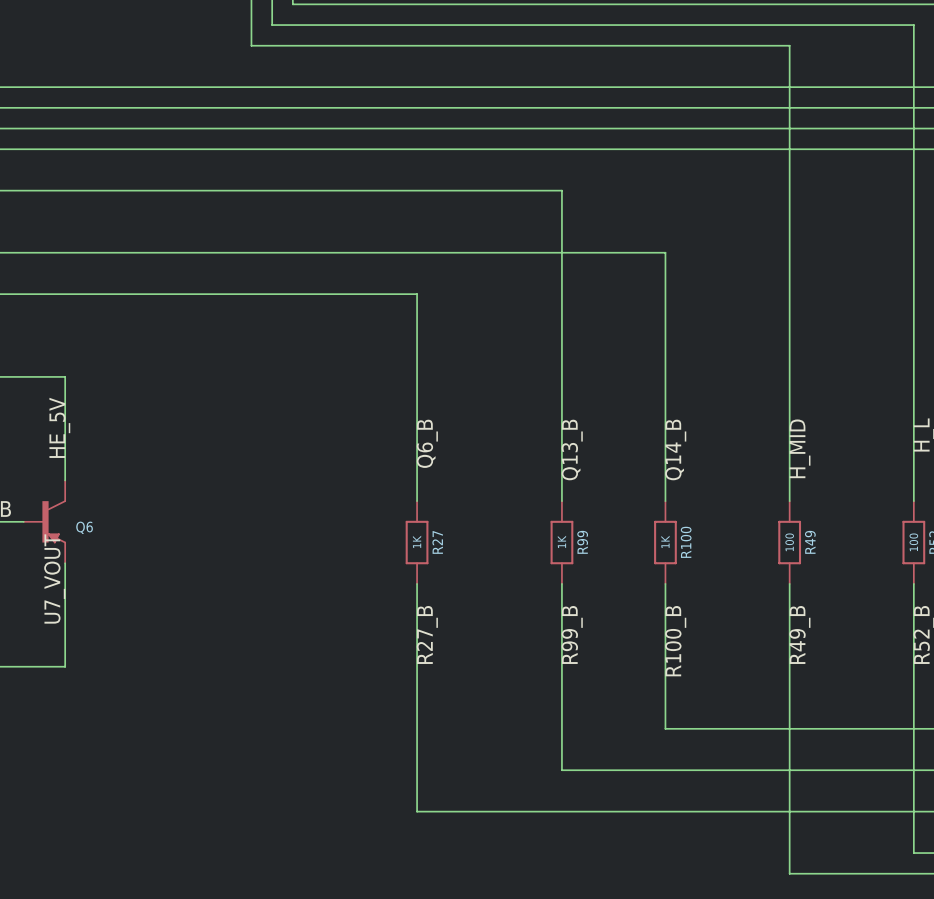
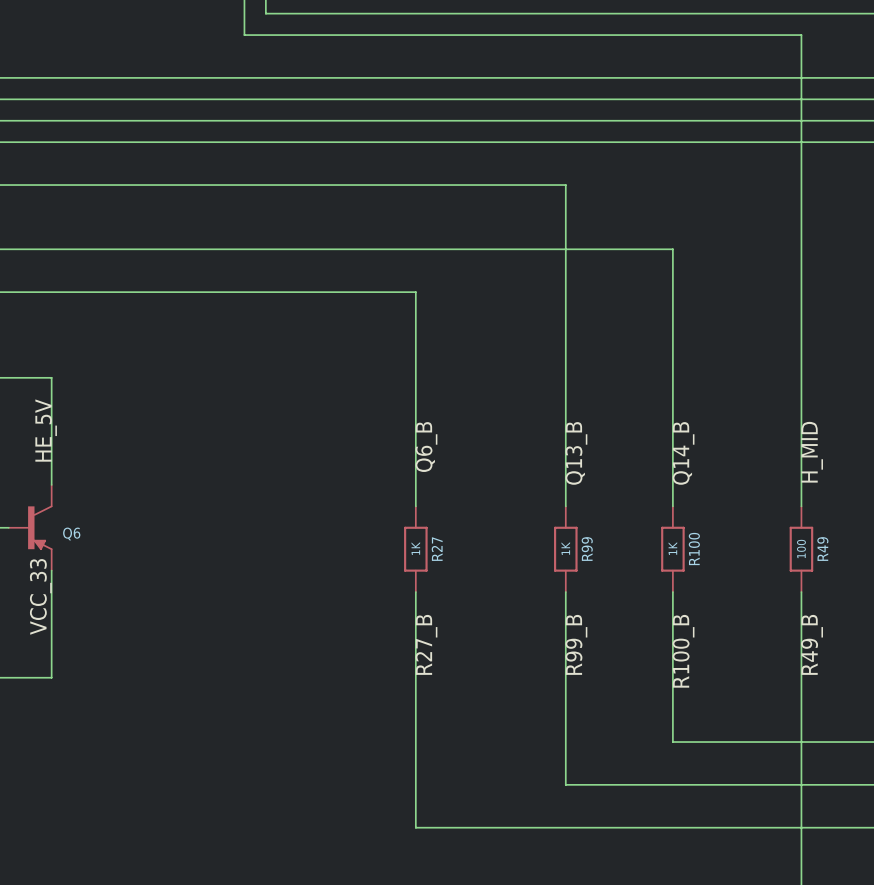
label: U7_VOUT (54, 578) -> VCC_33 (40, 596)

